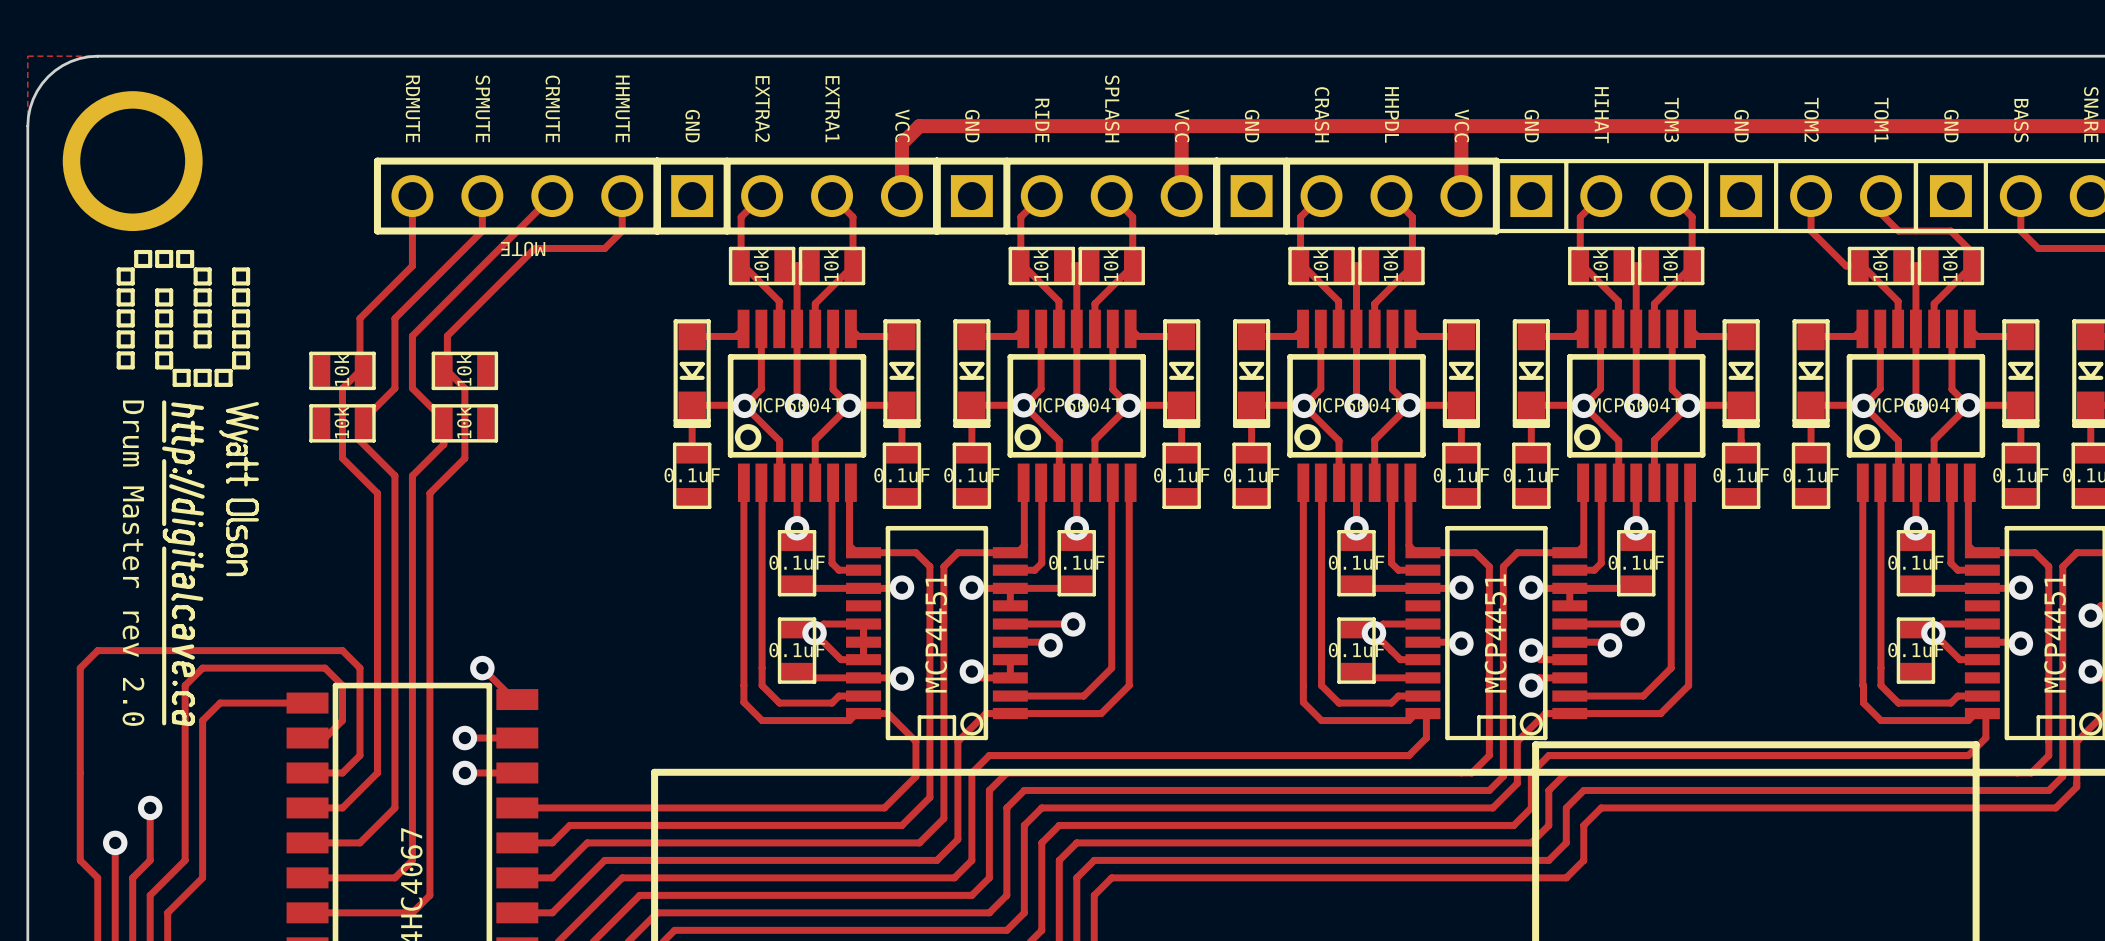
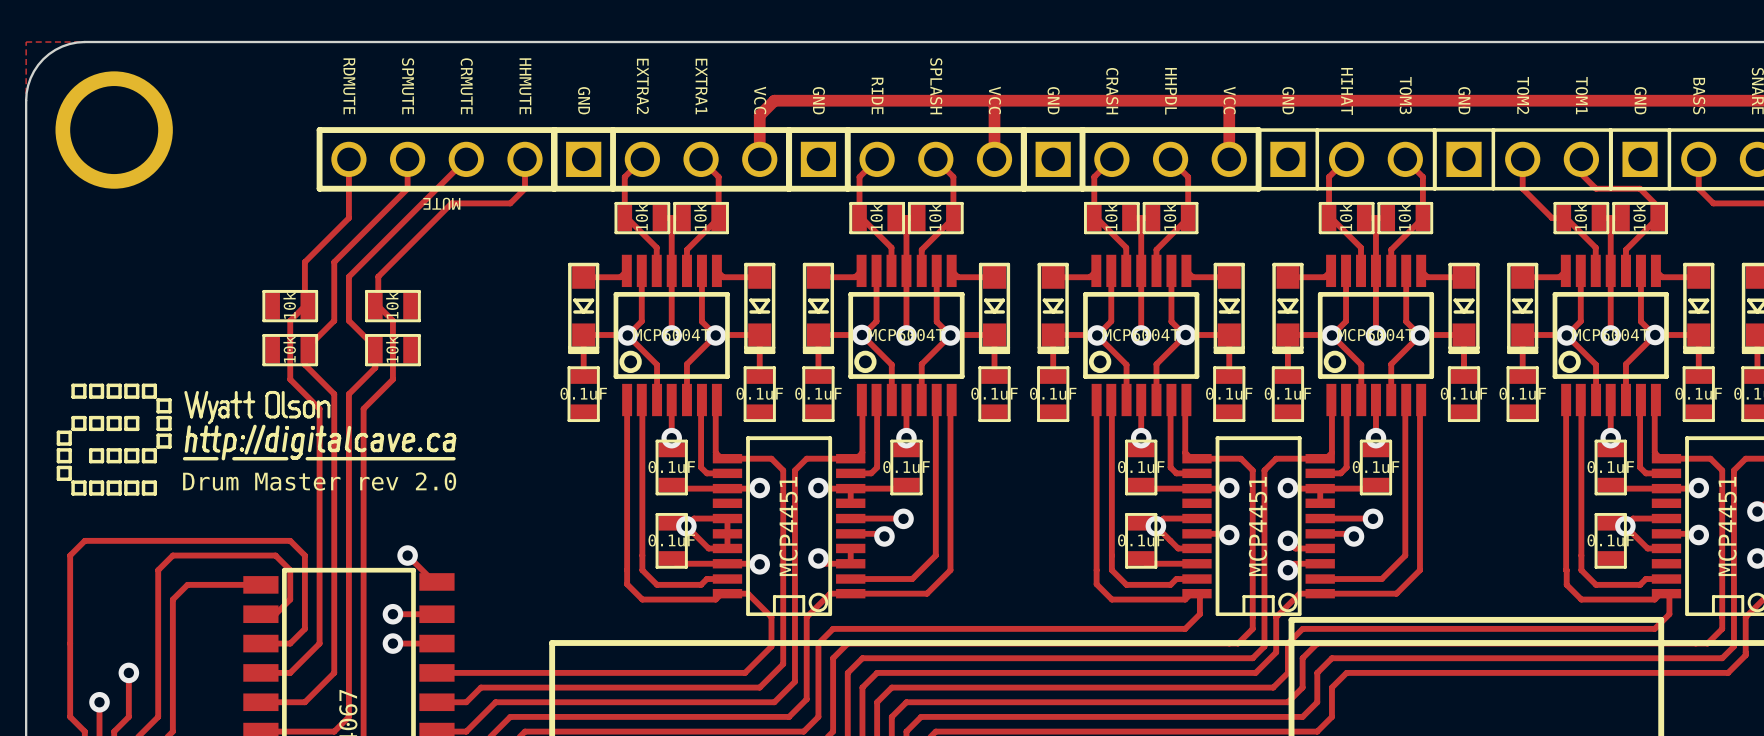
drawing: [116, 249, 259, 727] -> none
drawing: none -> [56, 383, 457, 496]
text rotation: 0° (133, 563) -> 90° counterclockwise (319, 481)

